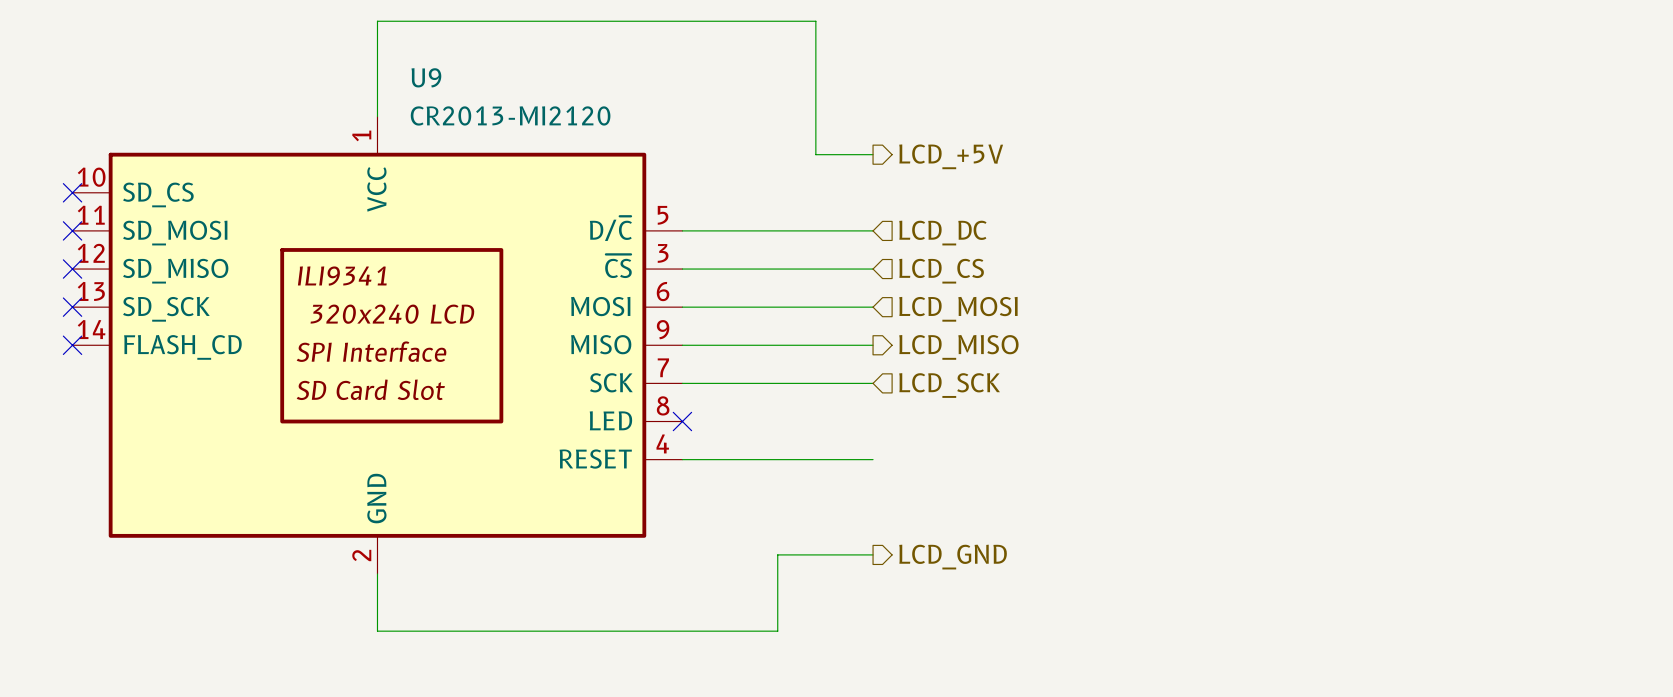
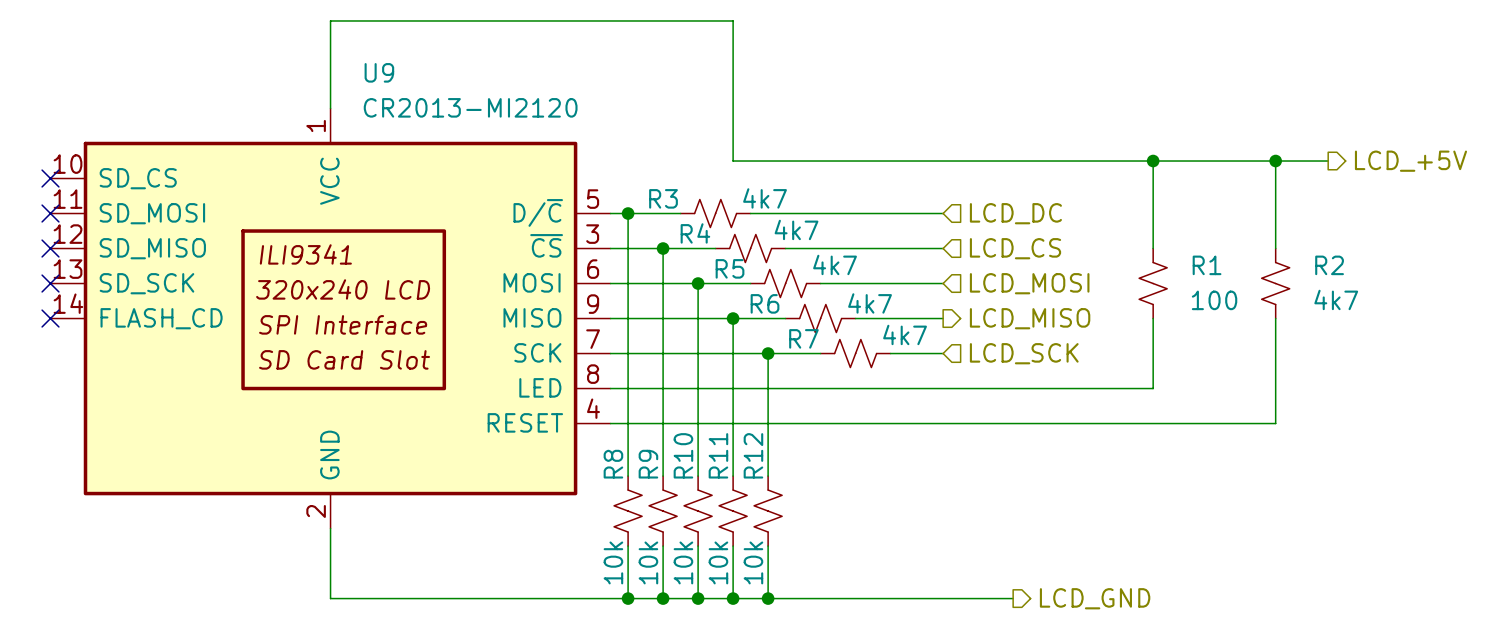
wire: (815, 154) (873, 154) -> (733, 143) (733, 161) (1328, 161)
hierarchical label: LCD_+5V (951, 156) -> none
wire: none -> (1153, 161) (1153, 248)
junction: none -> (1153, 161)
wire: none -> (1275, 161) (1275, 248)
junction: none -> (1275, 161)
hierarchical label: none -> LCD_+5V (1410, 161)
wire: none -> (628, 213) (628, 476)
junction: none -> (628, 213)
wire: (758, 230) (834, 230) -> none
R3: none -> 4k7 (715, 213)
wire: none -> (785, 213) (943, 213)
hierarchical label position: LCD_DC (942, 233) -> LCD_DC (1015, 213)
wire: none -> (663, 248) (663, 476)
junction: none -> (663, 248)
wire: (796, 269) (873, 269) -> (943, 248) (785, 248)
R4: none -> 4k7 (750, 248)
hierarchical label position: LCD_CS (941, 271) -> LCD_CS (1015, 248)
wire: none -> (698, 283) (698, 476)
junction: none -> (698, 283)
wire: (834, 307) (873, 307) -> (785, 353) (820, 353)
R5: none -> 4k7 (785, 283)
wire: none -> (820, 283) (943, 283)
R1: none -> 100 (1153, 283)
R2: none -> 4k7 (1275, 283)
hierarchical label position: LCD_MOSI (958, 309) -> LCD_MOSI (1029, 283)
wire: none -> (733, 318) (733, 476)
junction: none -> (733, 318)
R6: none -> 4k7 (820, 318)
wire: none -> (855, 318) (943, 318)
wire: none -> (1153, 318) (1153, 388) (610, 388)
wire: none -> (1275, 318) (1275, 423) (785, 423)
hierarchical label position: LCD_MISO (958, 347) -> LCD_MISO (1030, 318)
wire: none -> (768, 353) (768, 476)
junction: none -> (768, 353)
R7: none -> 4k7 (855, 353)
wire: none -> (890, 353) (943, 353)
hierarchical label position: LCD_SCK (949, 385) -> LCD_SCK (1024, 353)
no-connect mark: (682, 421) -> none
R8: none -> 10k (628, 511)
R9: none -> 10k (663, 511)
R10: none -> 10k (698, 511)
R11: none -> 10k (733, 511)
R12: none -> 10k (768, 511)
wire: (873, 554) (777, 554) (777, 593) -> none
hierarchical label position: LCD_GND (953, 557) -> LCD_GND (1095, 598)
wire: none -> (628, 546) (628, 598)
wire: none -> (663, 546) (663, 598)
wire: none -> (733, 546) (733, 598)
wire: none -> (768, 546) (768, 598)
wire: (377, 631) (777, 631) -> (330, 581) (330, 598) (1013, 598)
wire: none -> (698, 581) (698, 598)
junction: none -> (628, 598)
junction: none -> (663, 598)
junction: none -> (698, 598)
junction: none -> (733, 598)
junction: none -> (768, 598)

